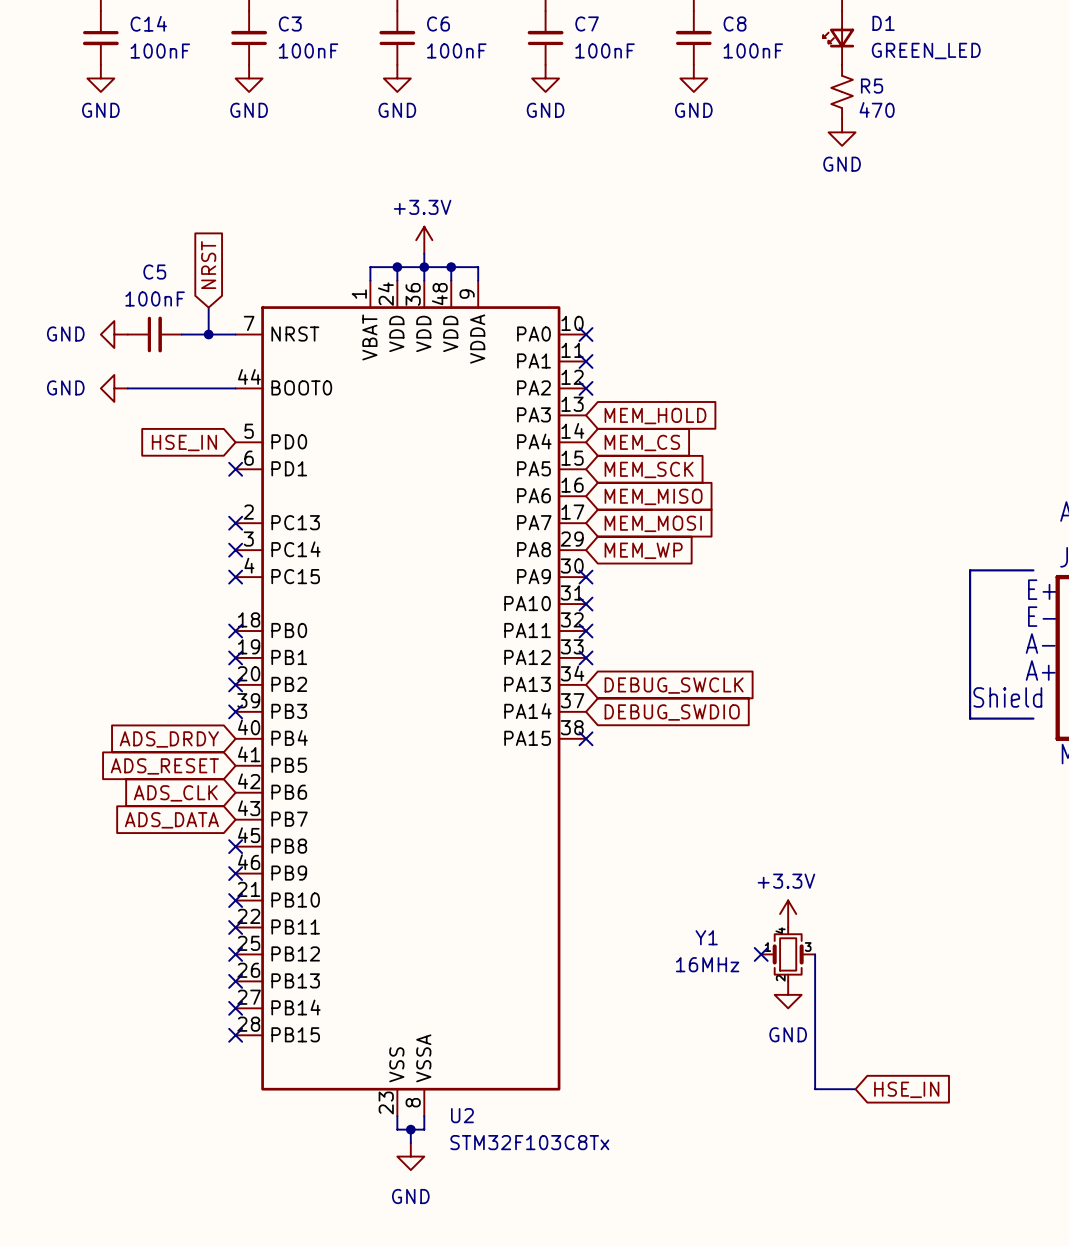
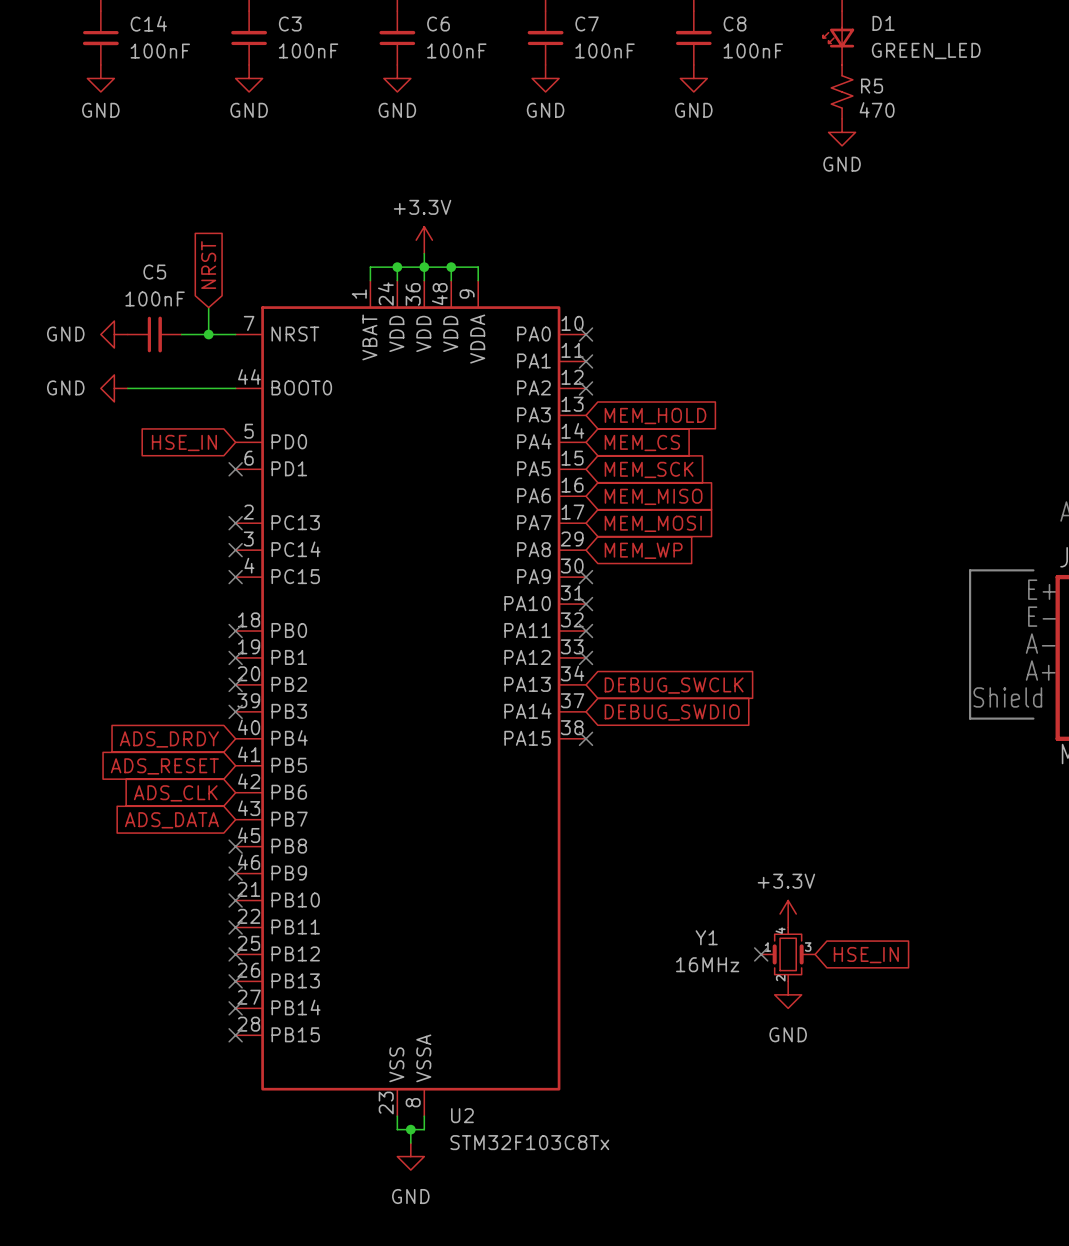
wire: (815, 954) (815, 1089) (855, 1089) -> none
global label position: HSE_IN (906, 1089) -> HSE_IN (866, 955)

